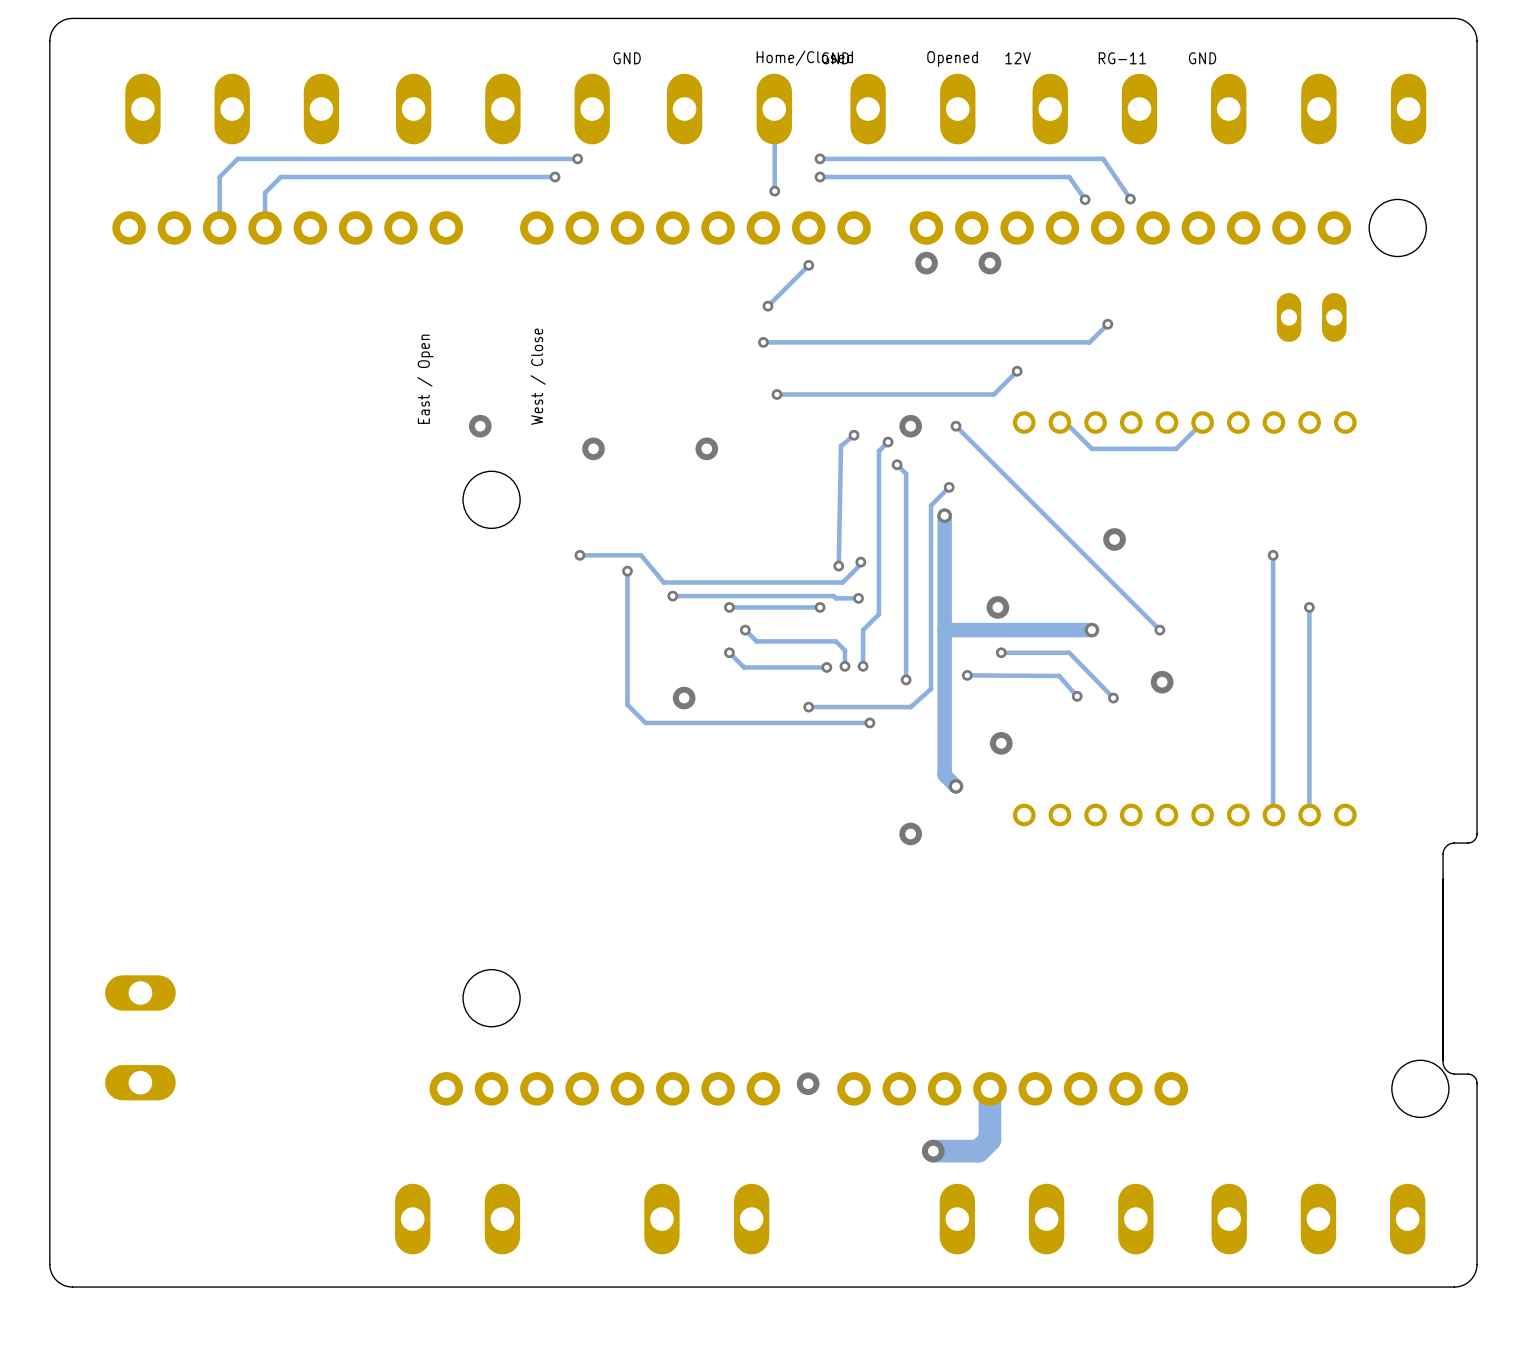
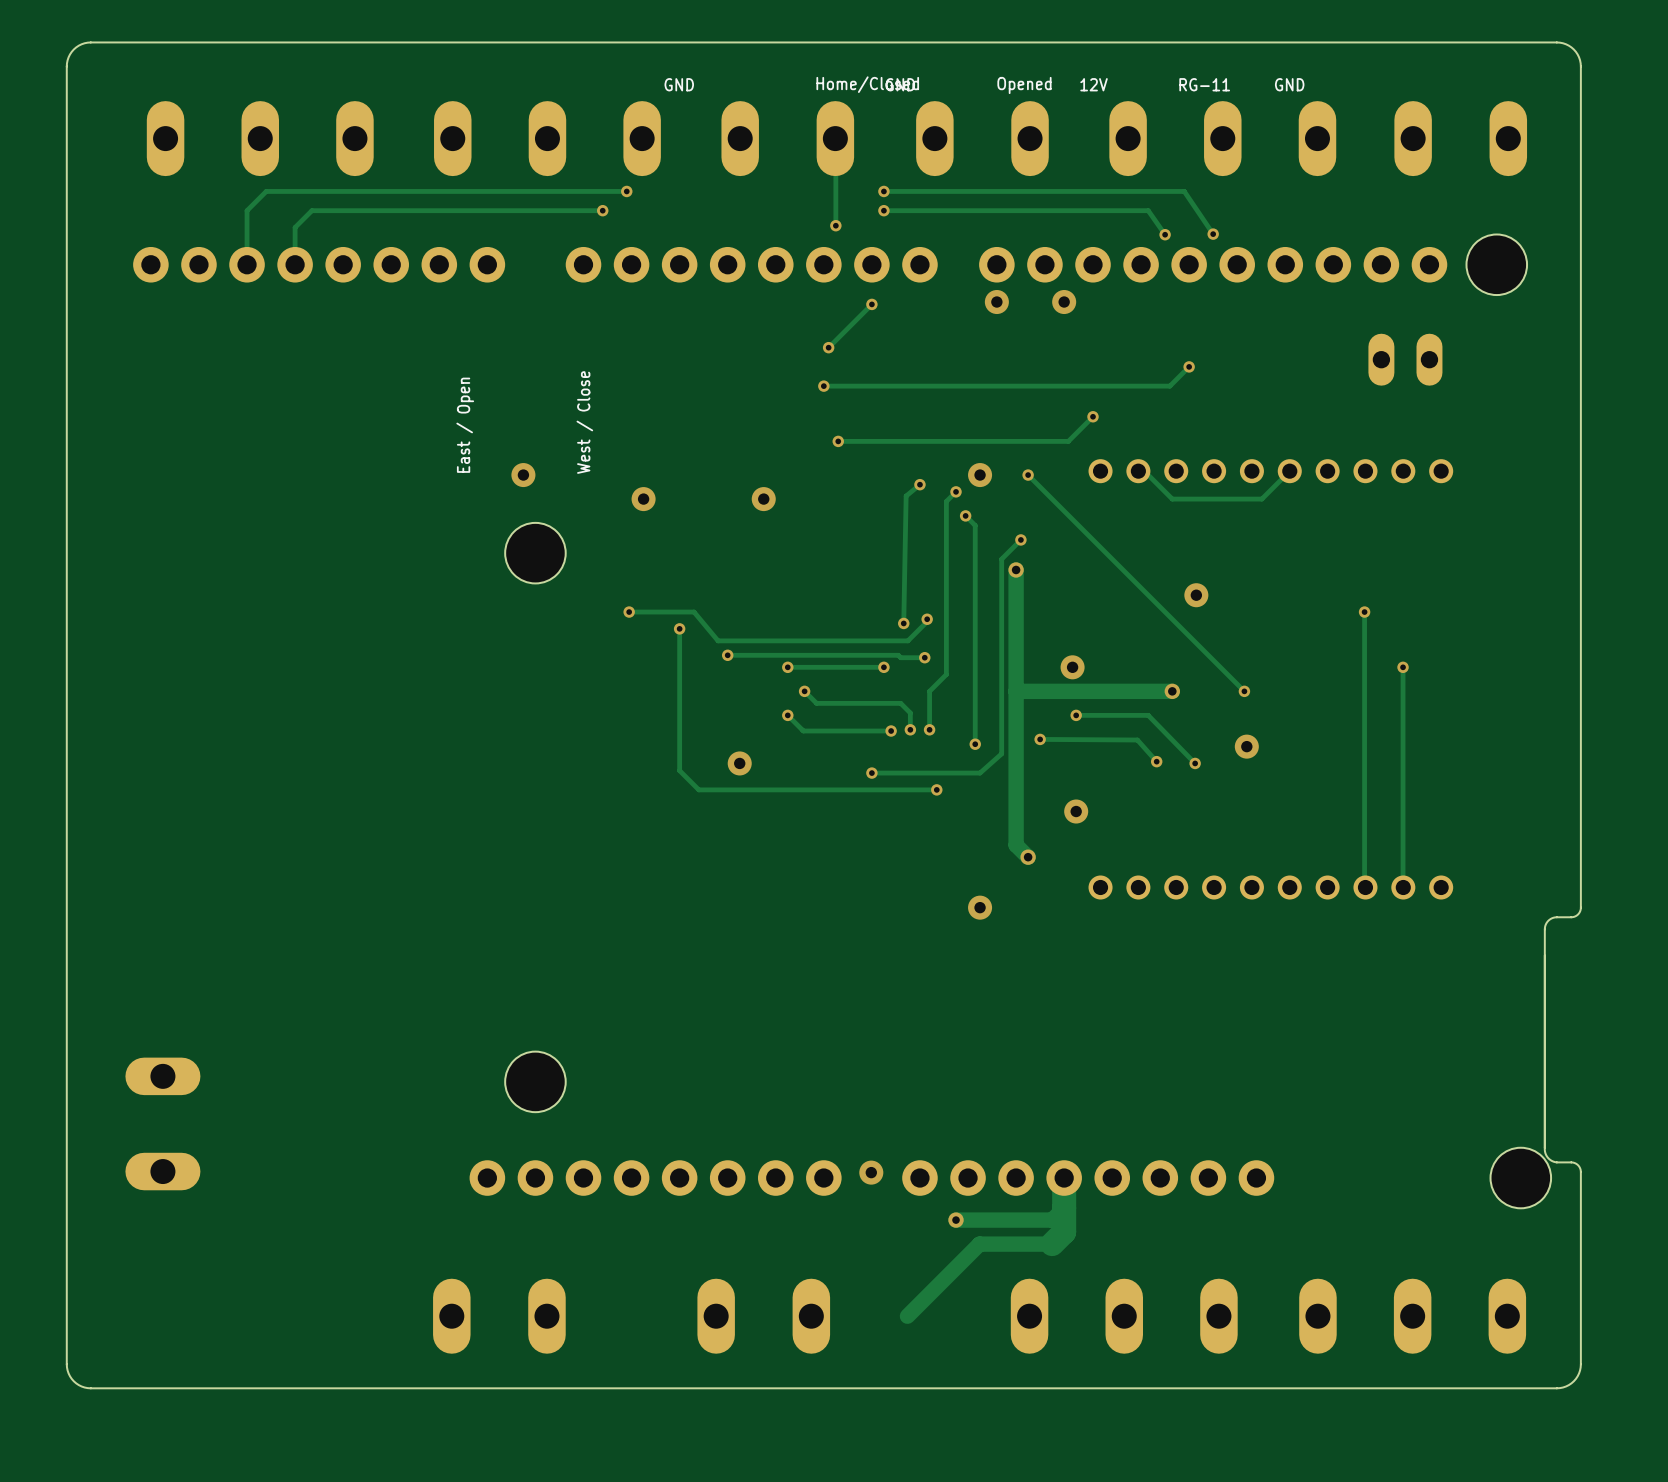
track: none -> (1064, 1208) (1052, 1220) (956, 1220)
via: none -> (956, 1220)
track: none -> (1004, 1244) (979, 1244) (907, 1316)
via: (933, 1151) -> none
track width: thick (978, 1151) (933, 1151) -> thin (1052, 1244) (1004, 1244)

